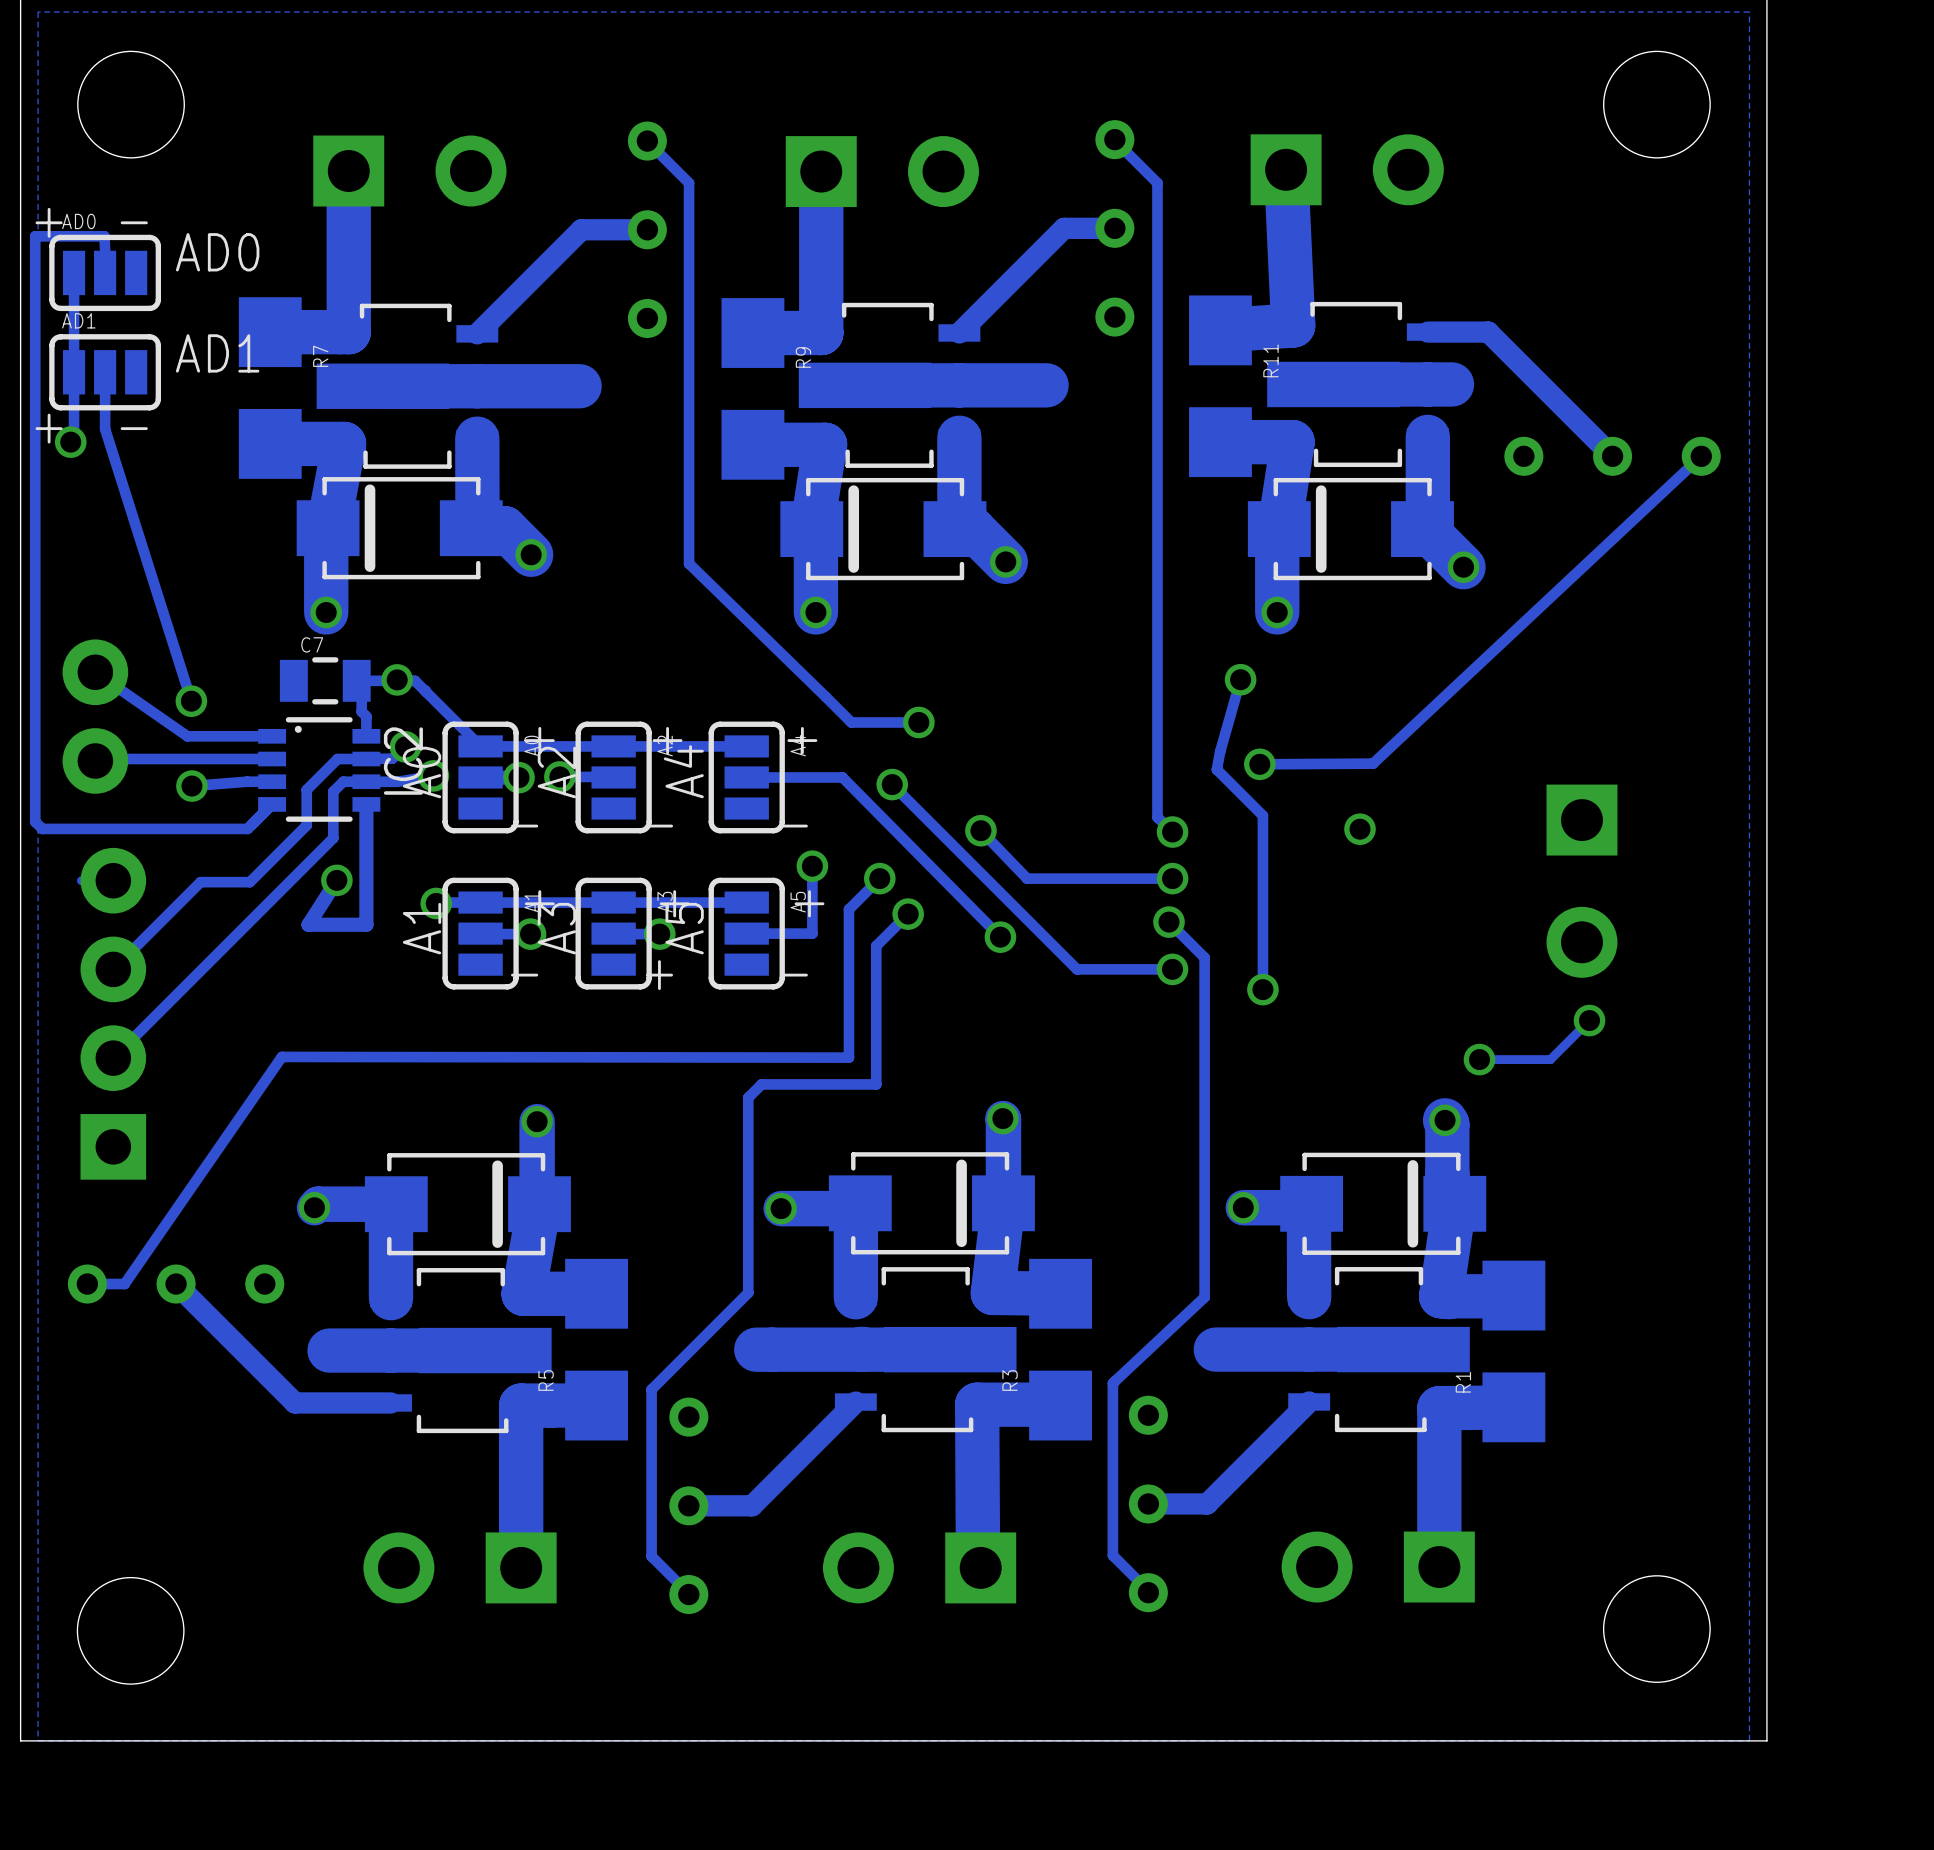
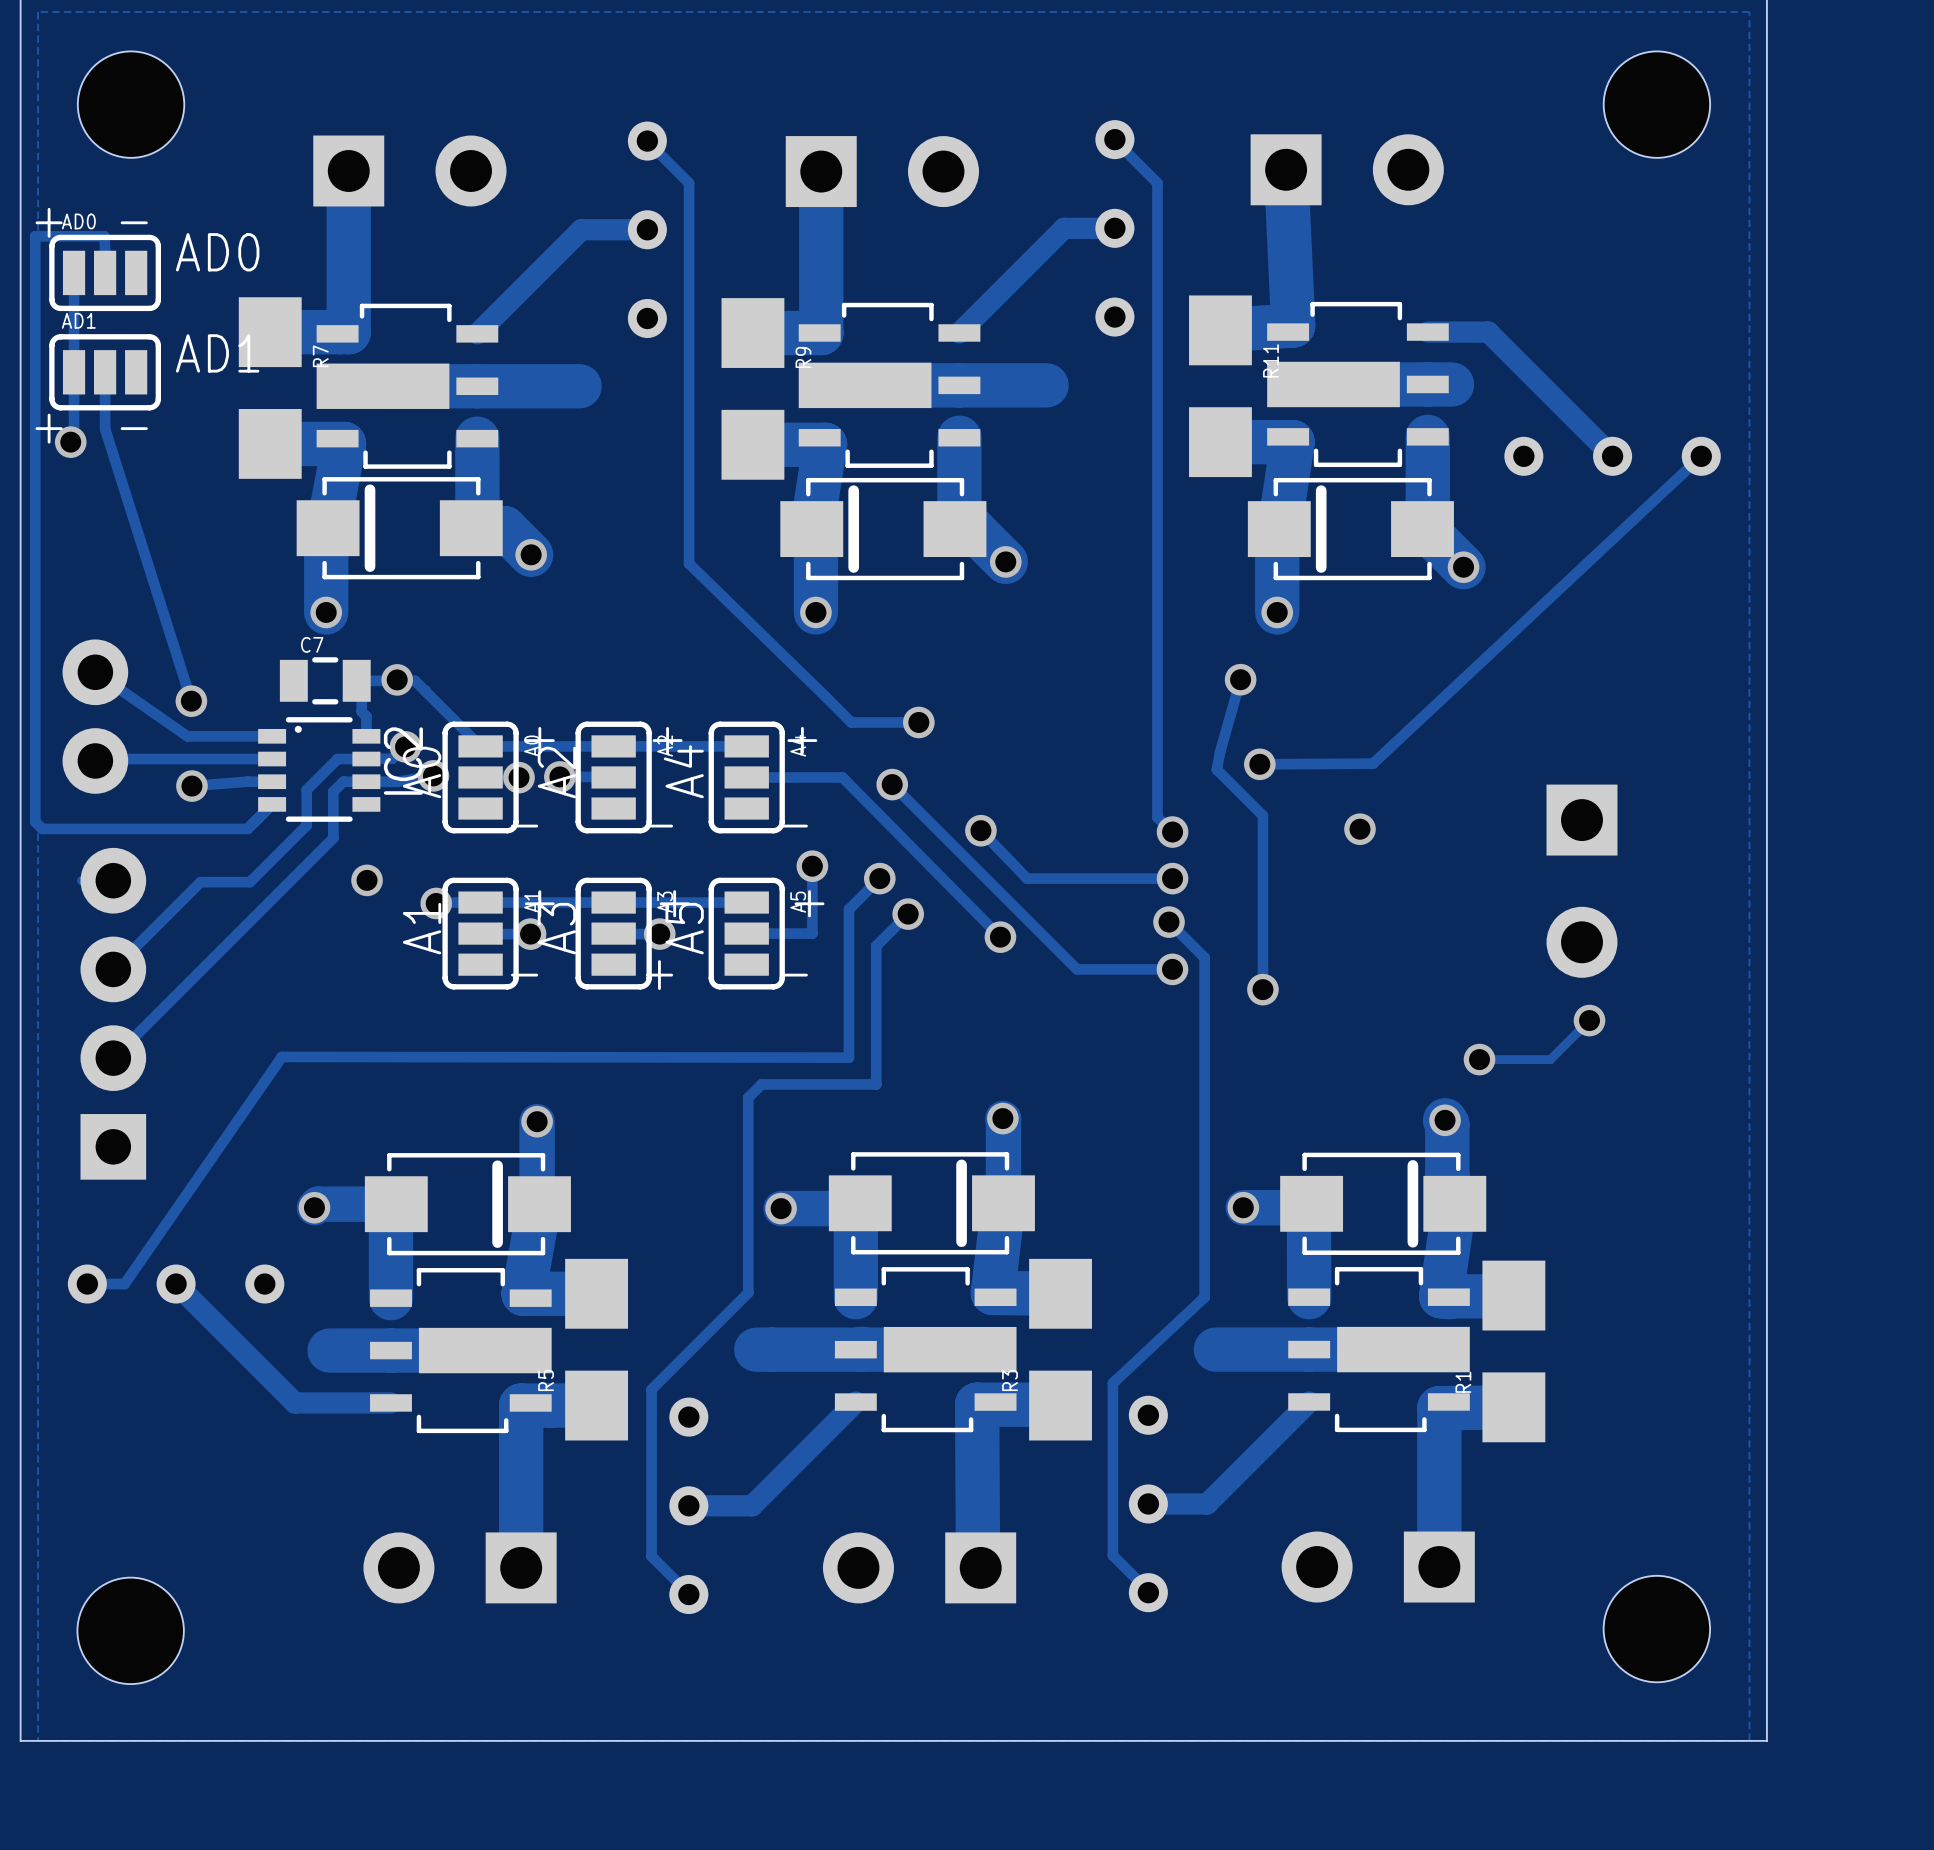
track: (366, 804) (366, 924) (308, 924) (336, 880) -> none
via position: (336, 880) -> (367, 880)

